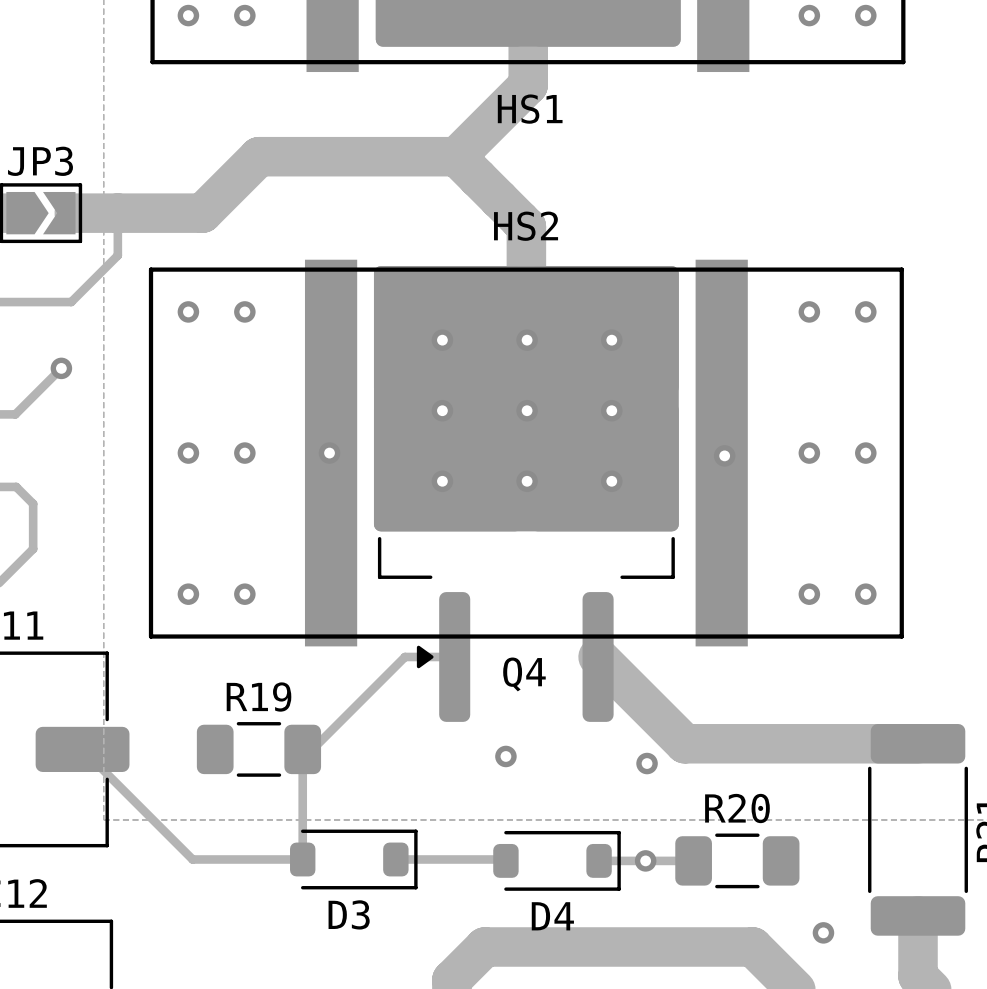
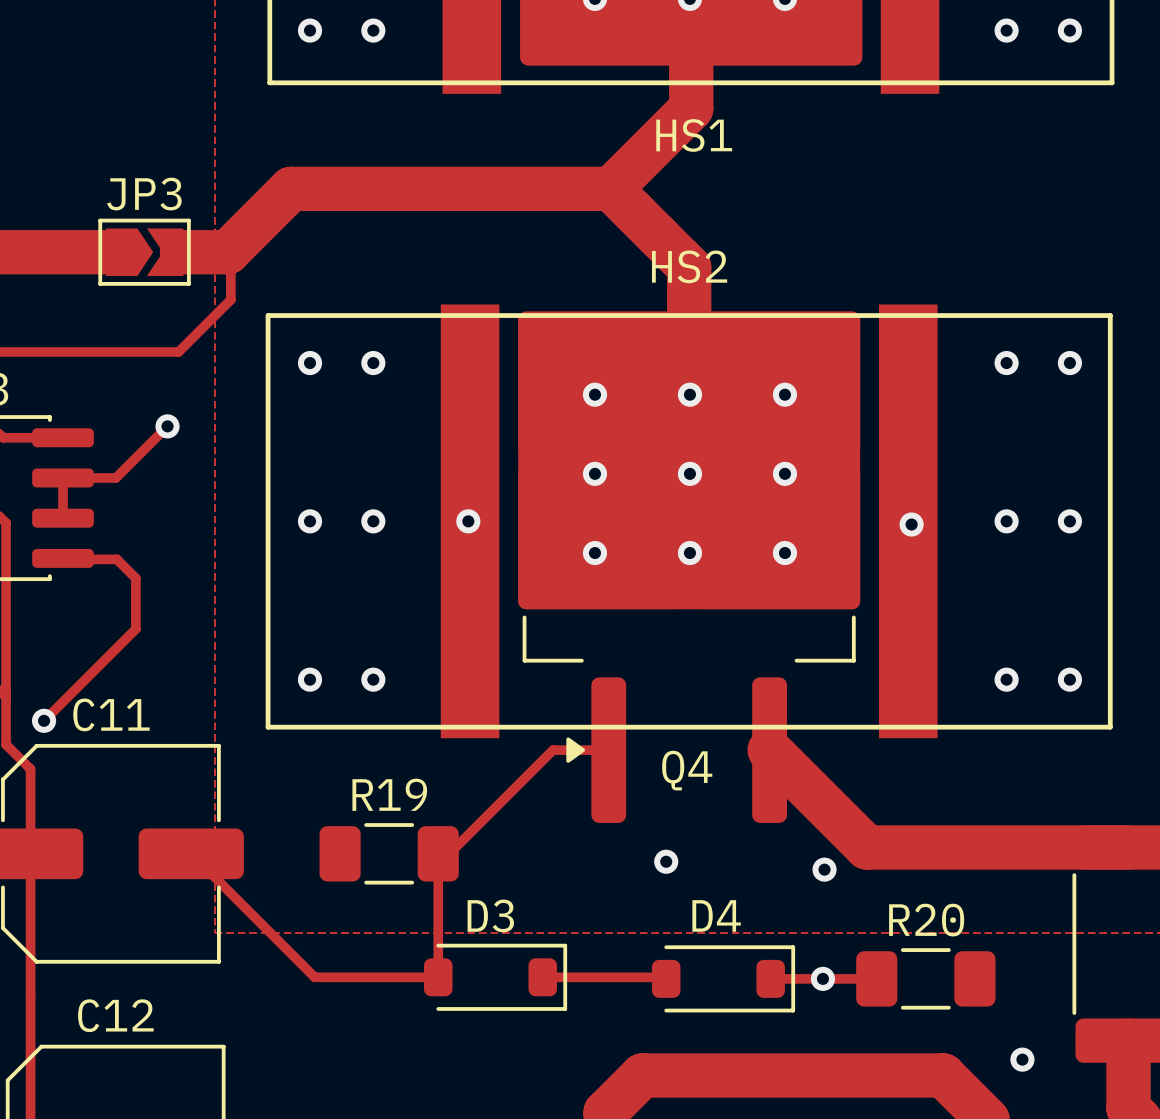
track: (258, 156) (202, 213) (115, 213) -> (389, 188) (291, 188) (227, 252)
D3 name position: D3 (349, 914) -> D3 (490, 915)
D4 name position: D4 (552, 916) -> D4 (716, 915)

